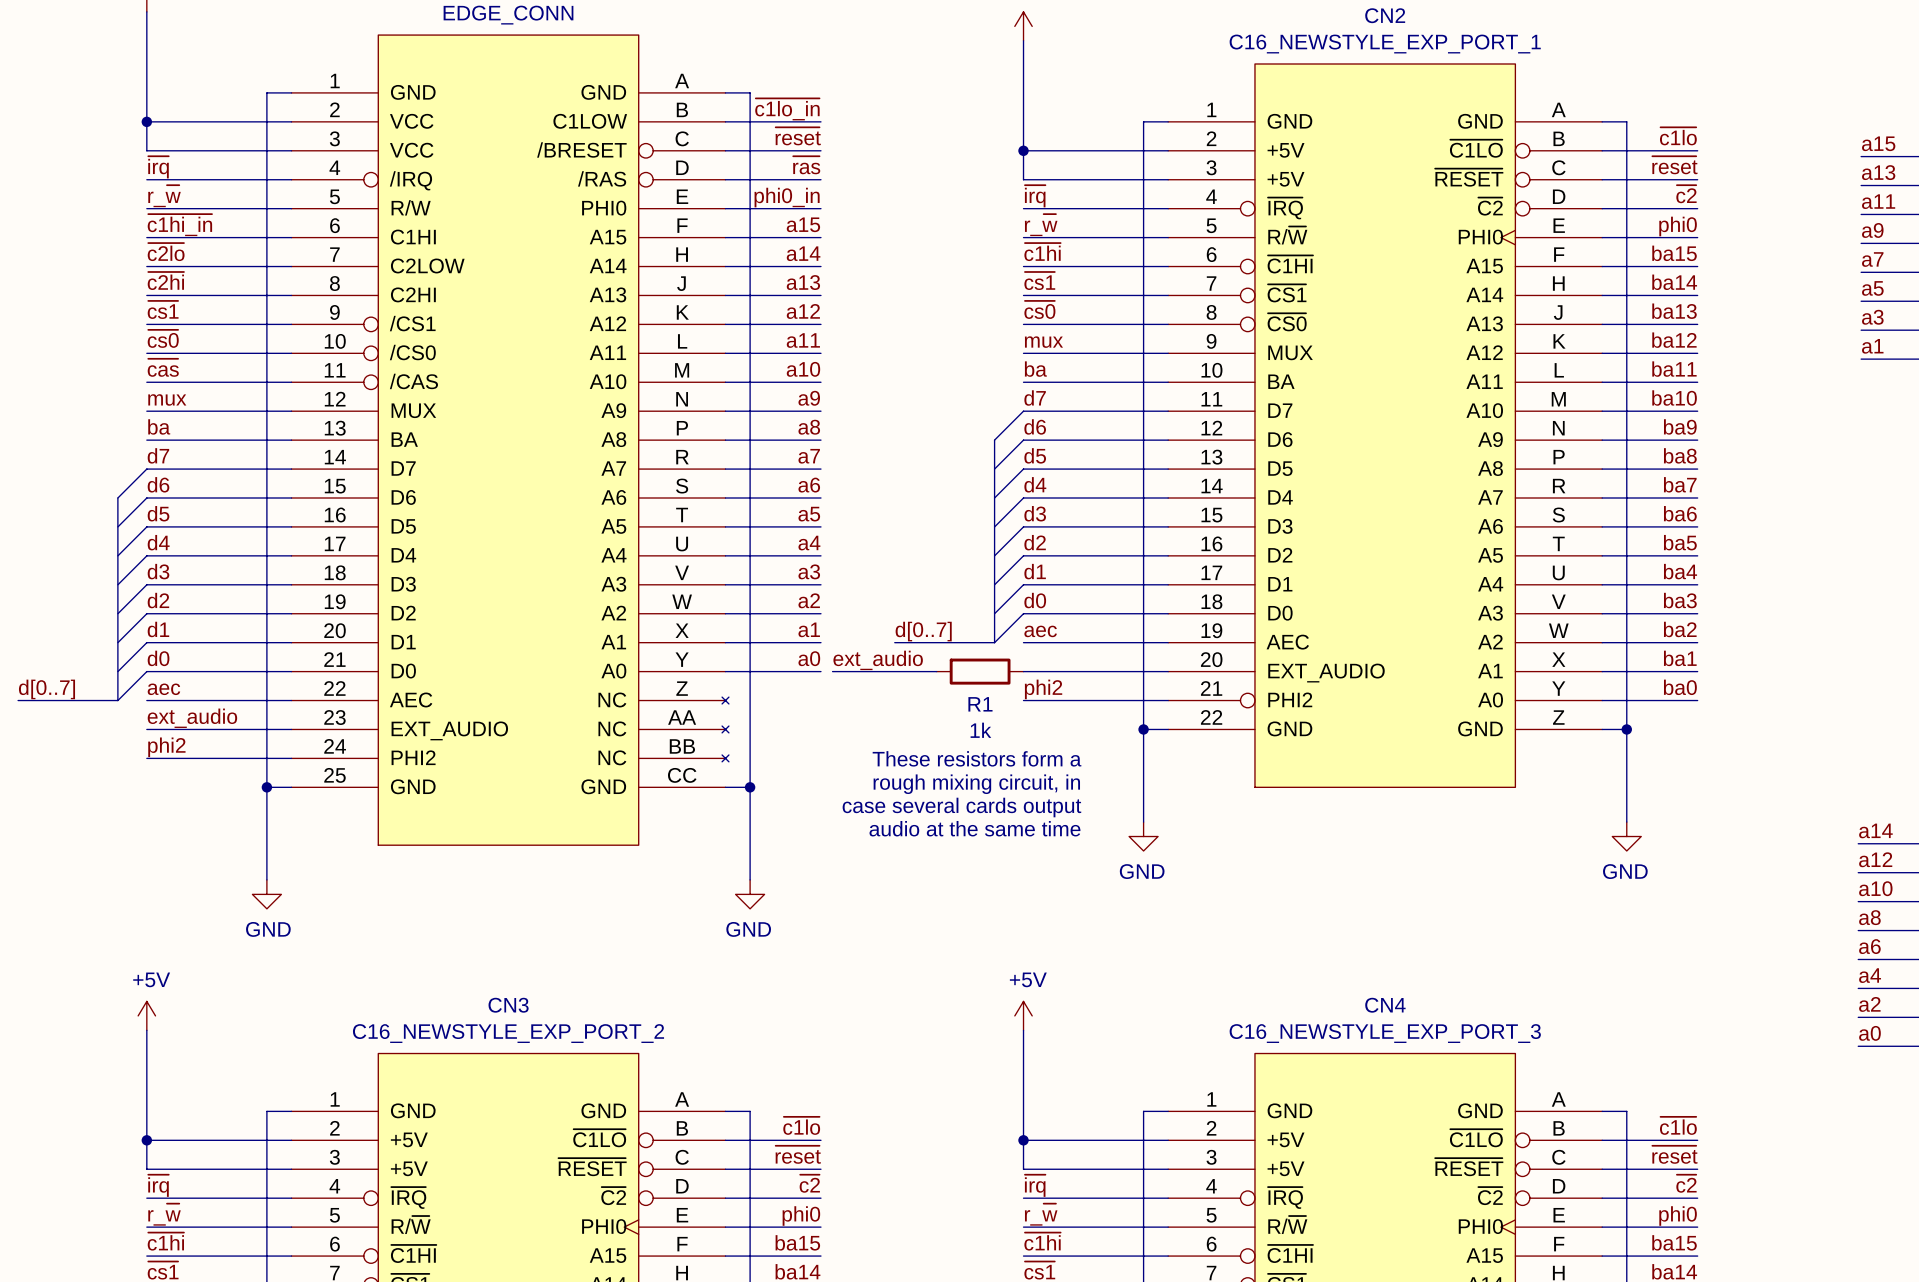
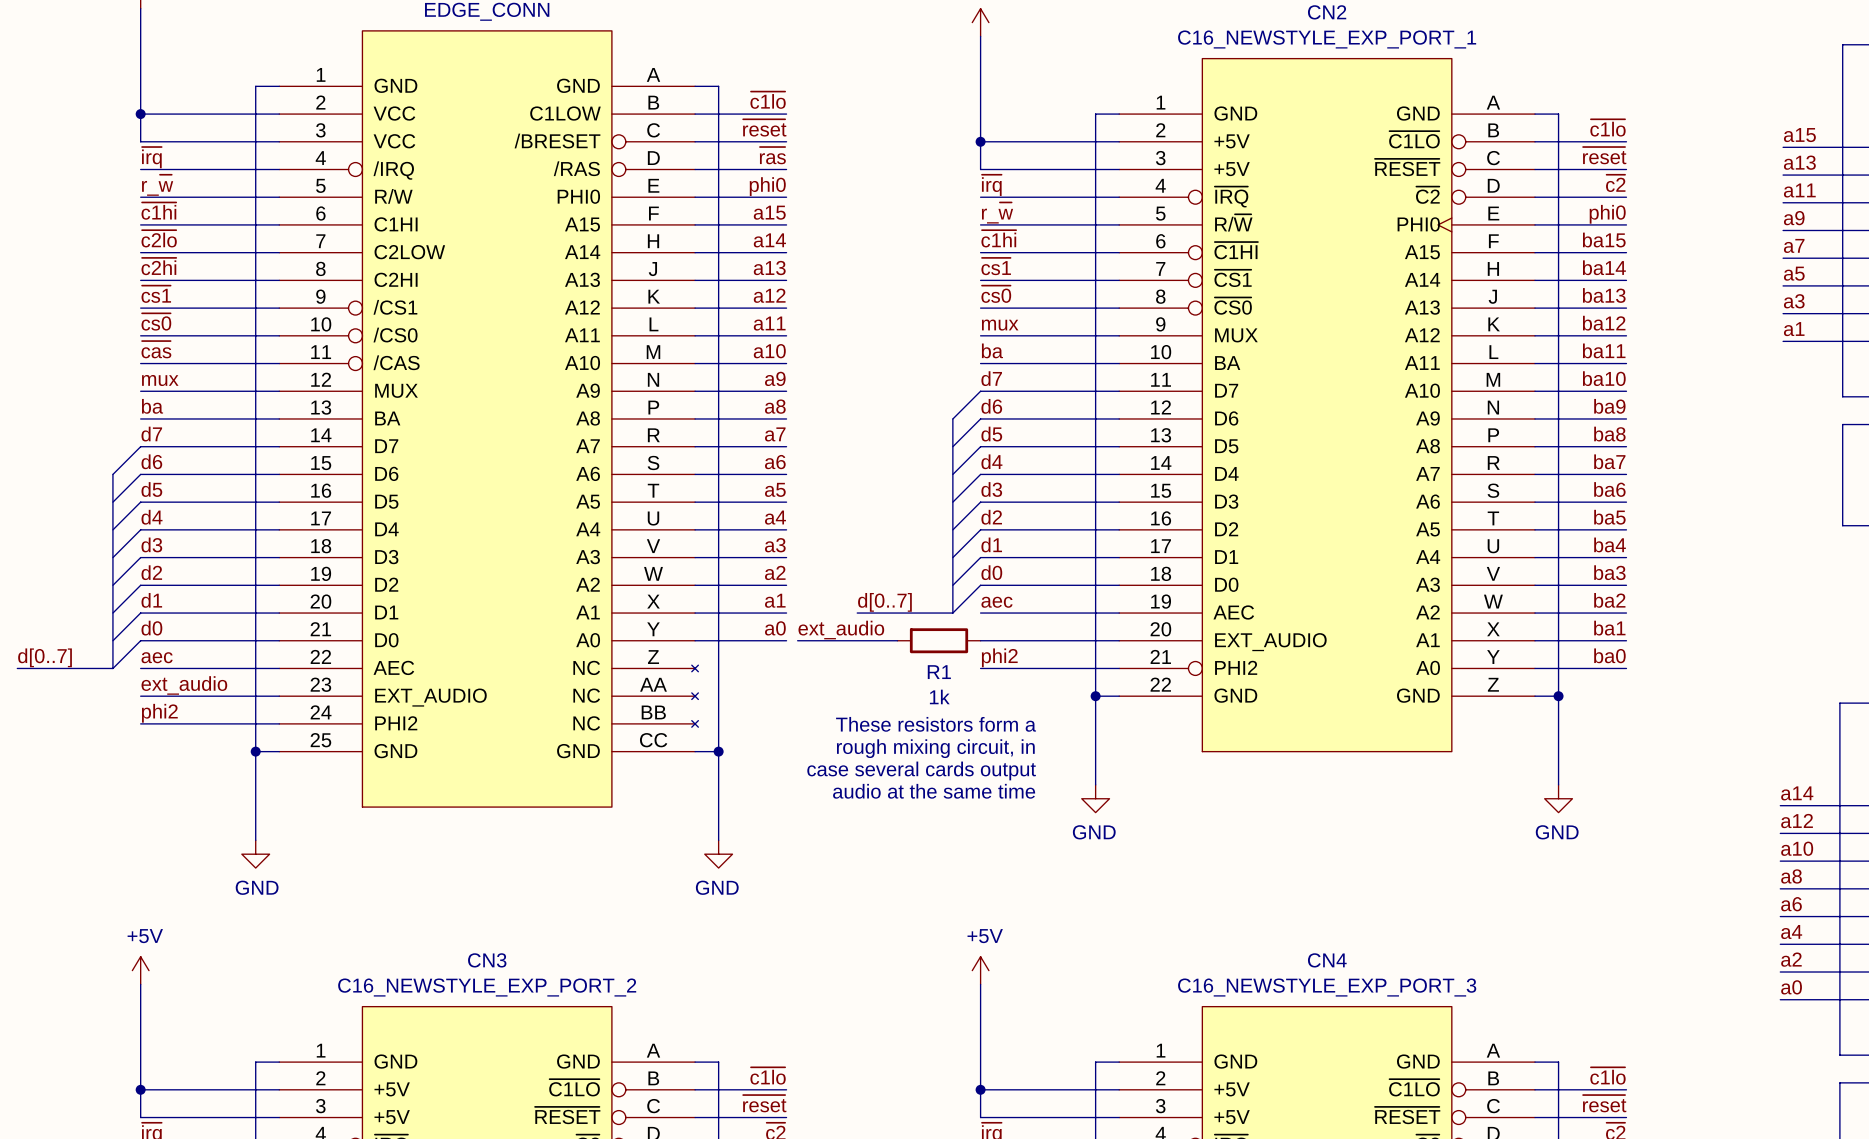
label: ~{c1lo_in} (787, 109) -> ~{c1lo} (768, 100)
label: phi0_in (787, 197) -> phi0 (767, 186)
label: ~{c1hi_in} (179, 225) -> ~{c1hi} (158, 211)

